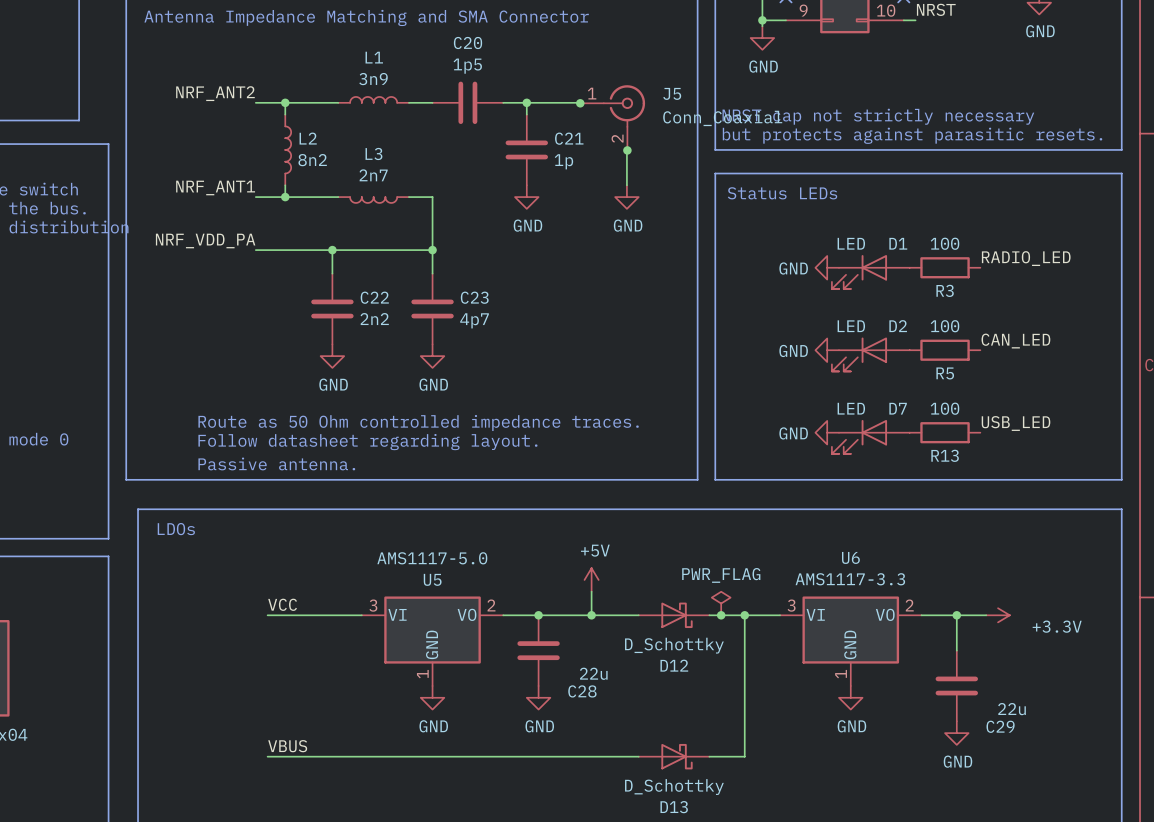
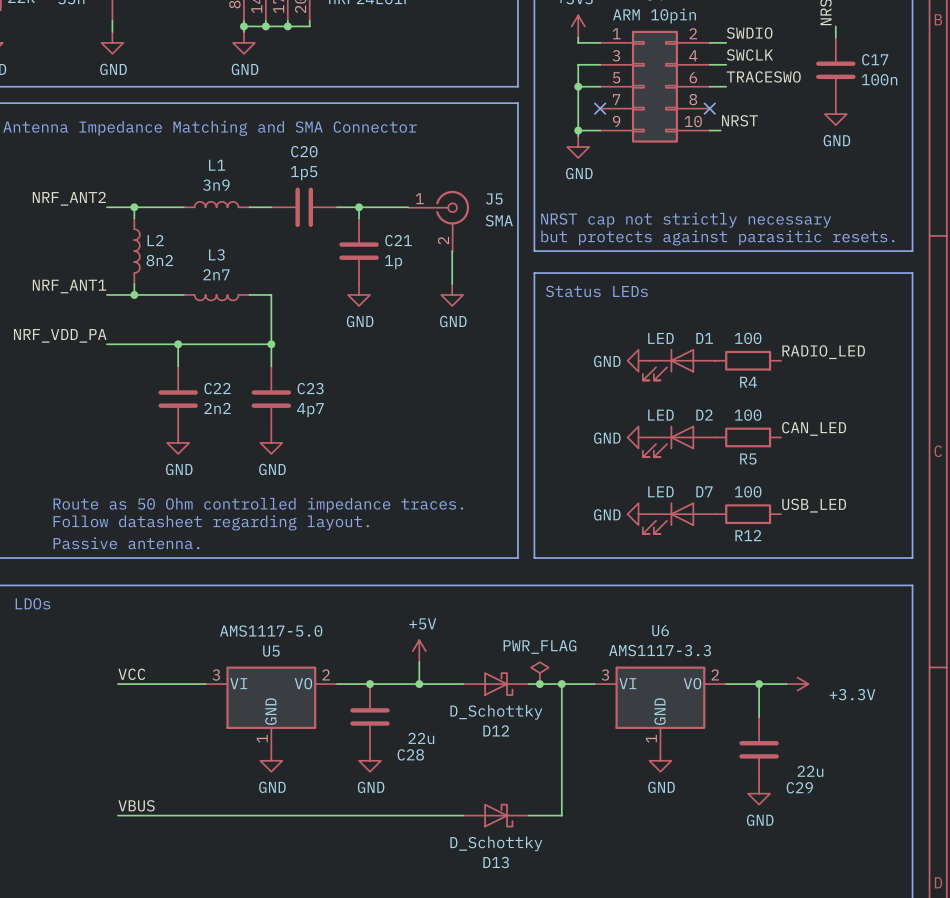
junction: (580, 103) -> none
J5 value: Conn_Coaxial (722, 118) -> SMA (499, 220)
junction: (627, 150) -> none
R3 name: R3 (945, 290) -> R4 (748, 382)
R13 name: R13 (945, 455) -> R12 (748, 535)

